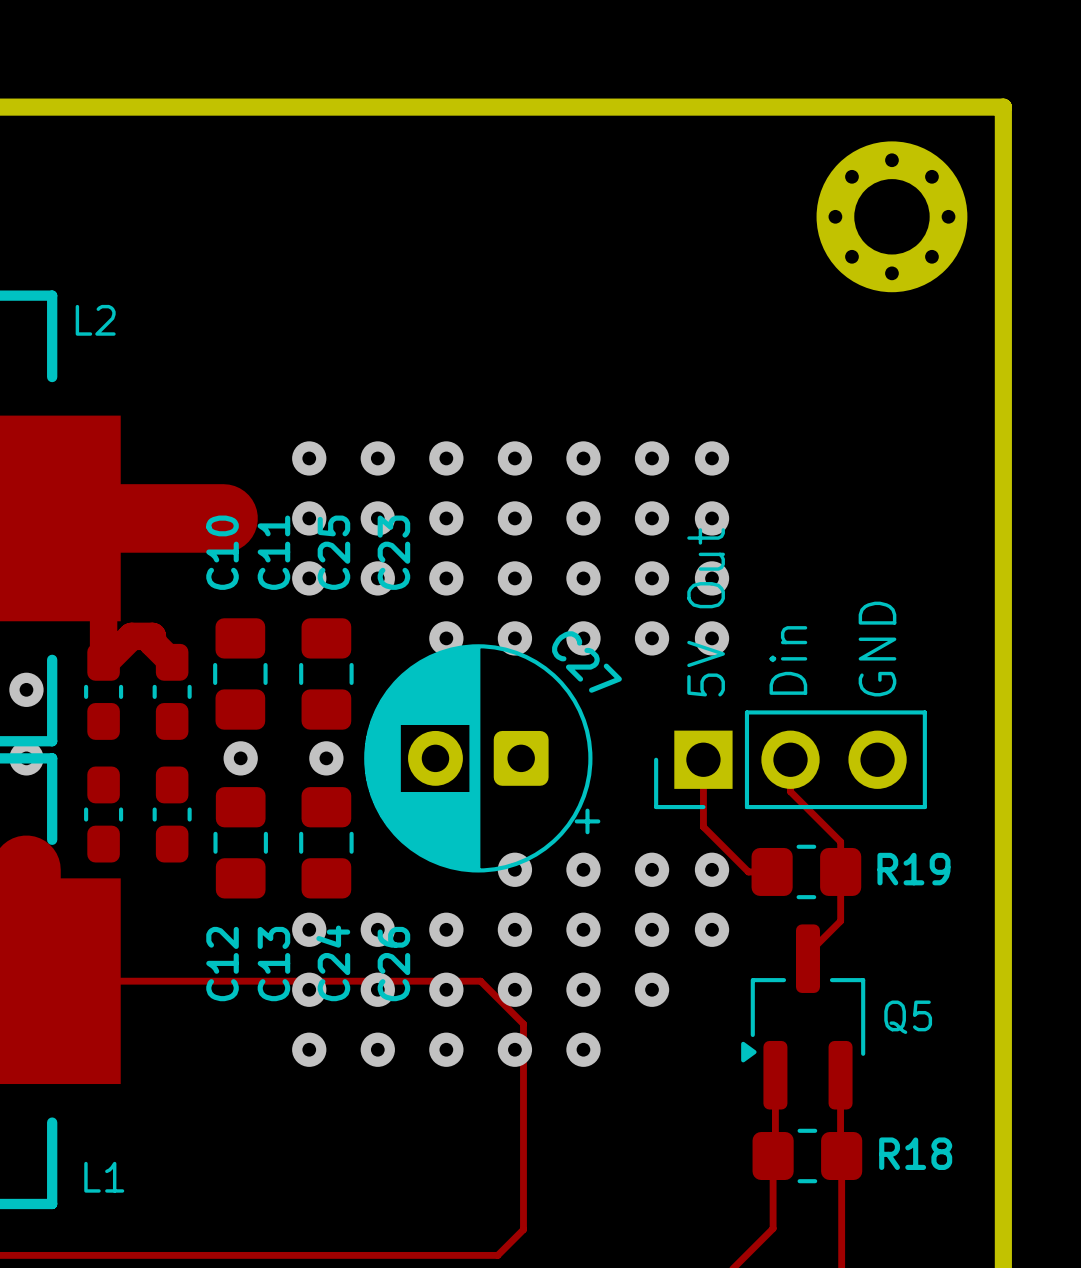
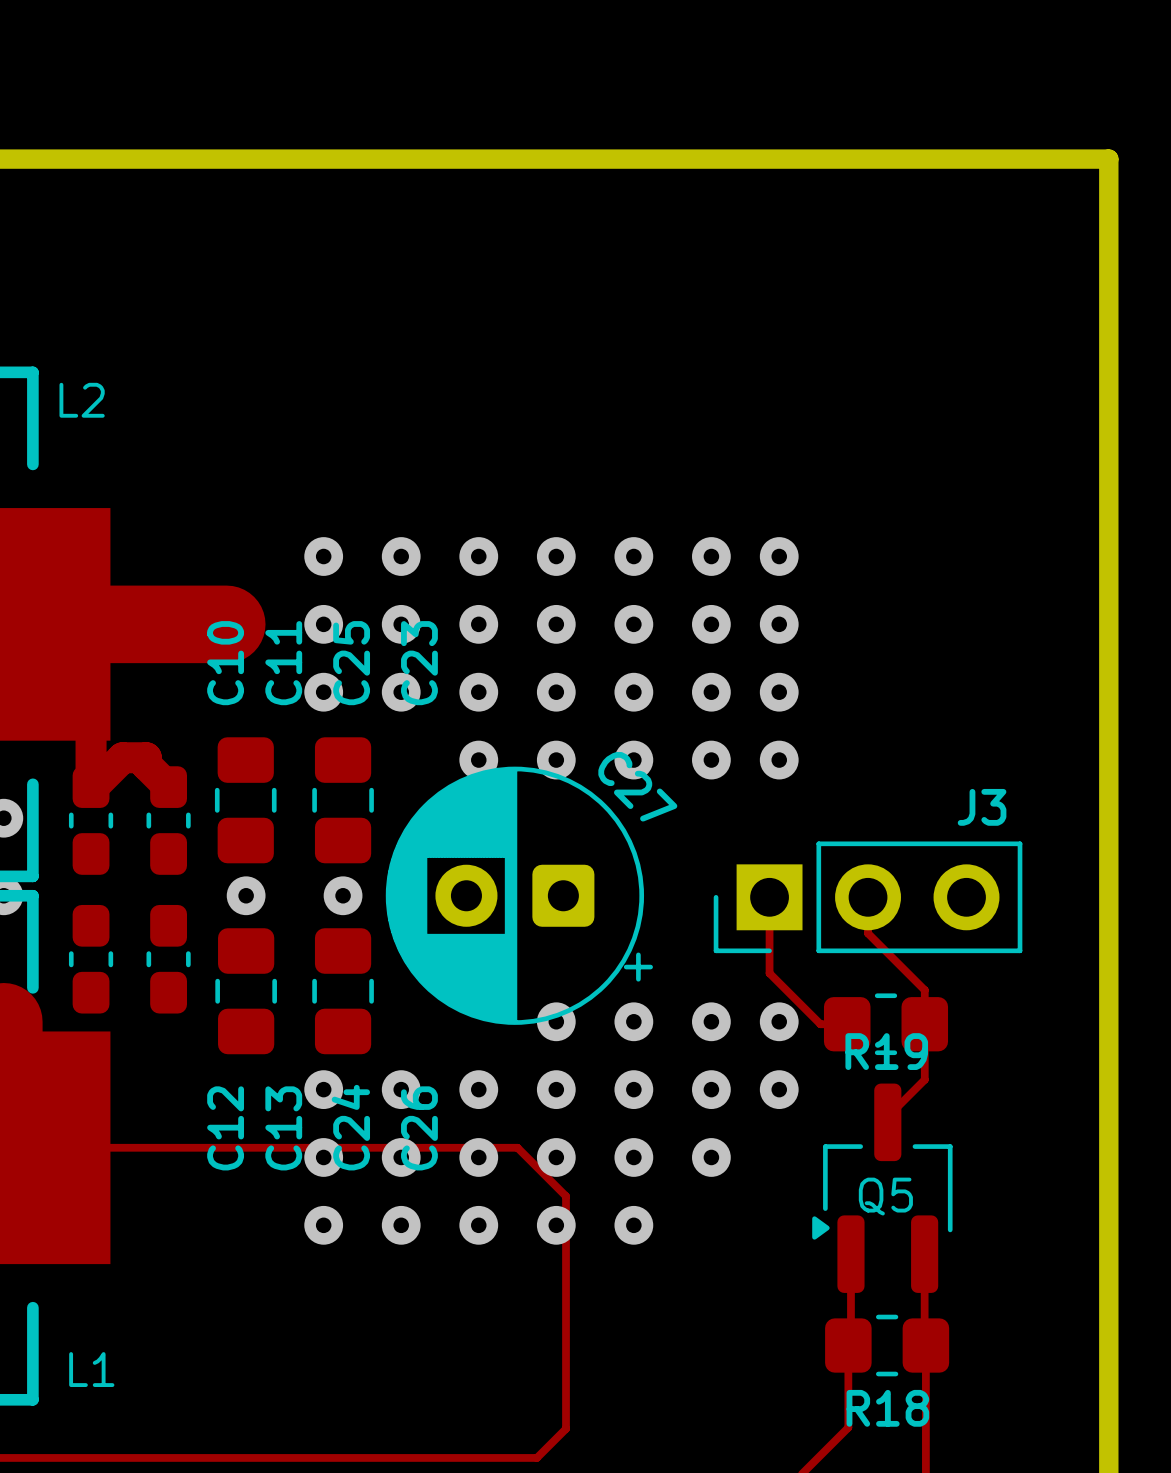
part: (891, 216) -> none
text: 5V Out (706, 612) -> none
text: GND (877, 649) -> none
text: Din (788, 660) -> none
J3 name: none -> J3 (982, 807)
R19 name position: R19 (913, 869) -> R19 (886, 1051)
Q5 name position: Q5 (908, 1017) -> Q5 (885, 1196)
R18 name position: R18 (915, 1153) -> R18 (887, 1408)

